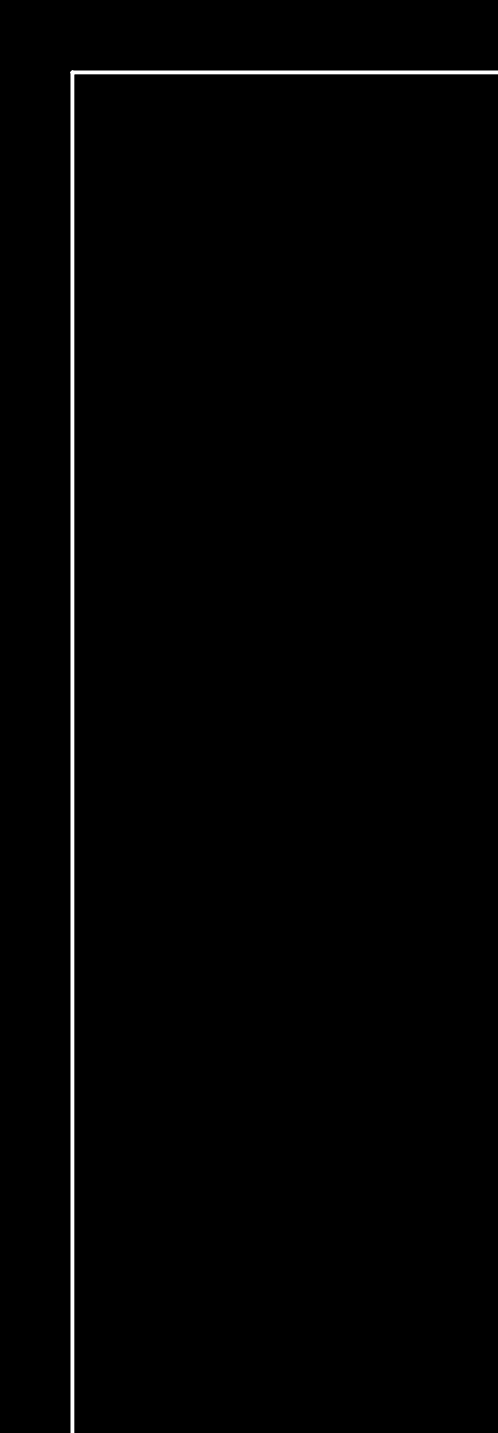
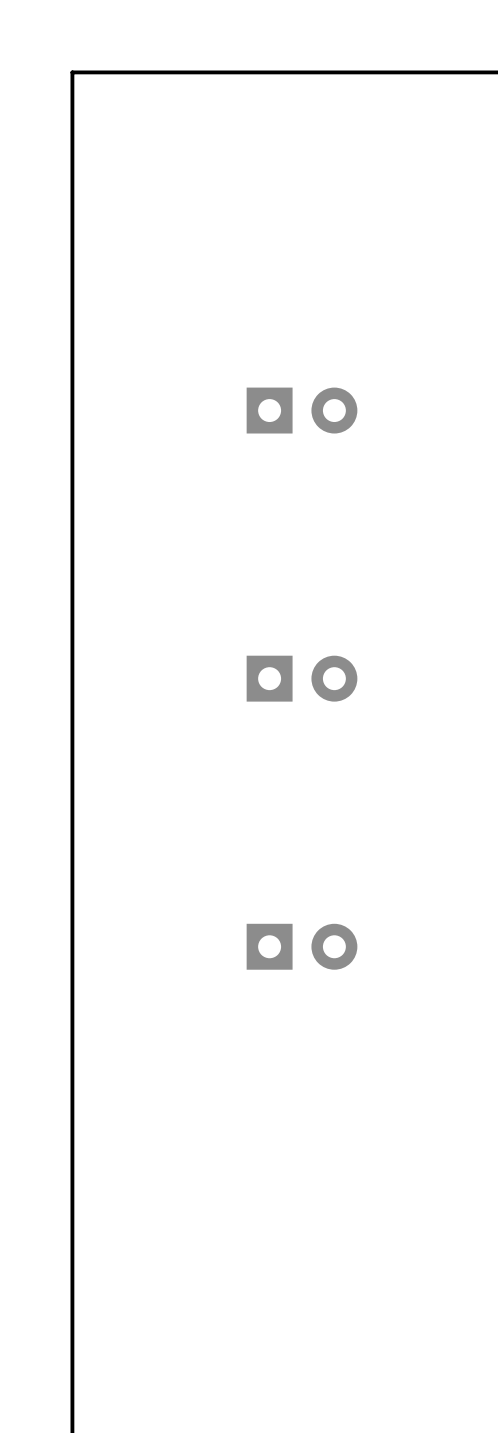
part: none -> (302, 410)
part: none -> (302, 678)
part: none -> (302, 946)

